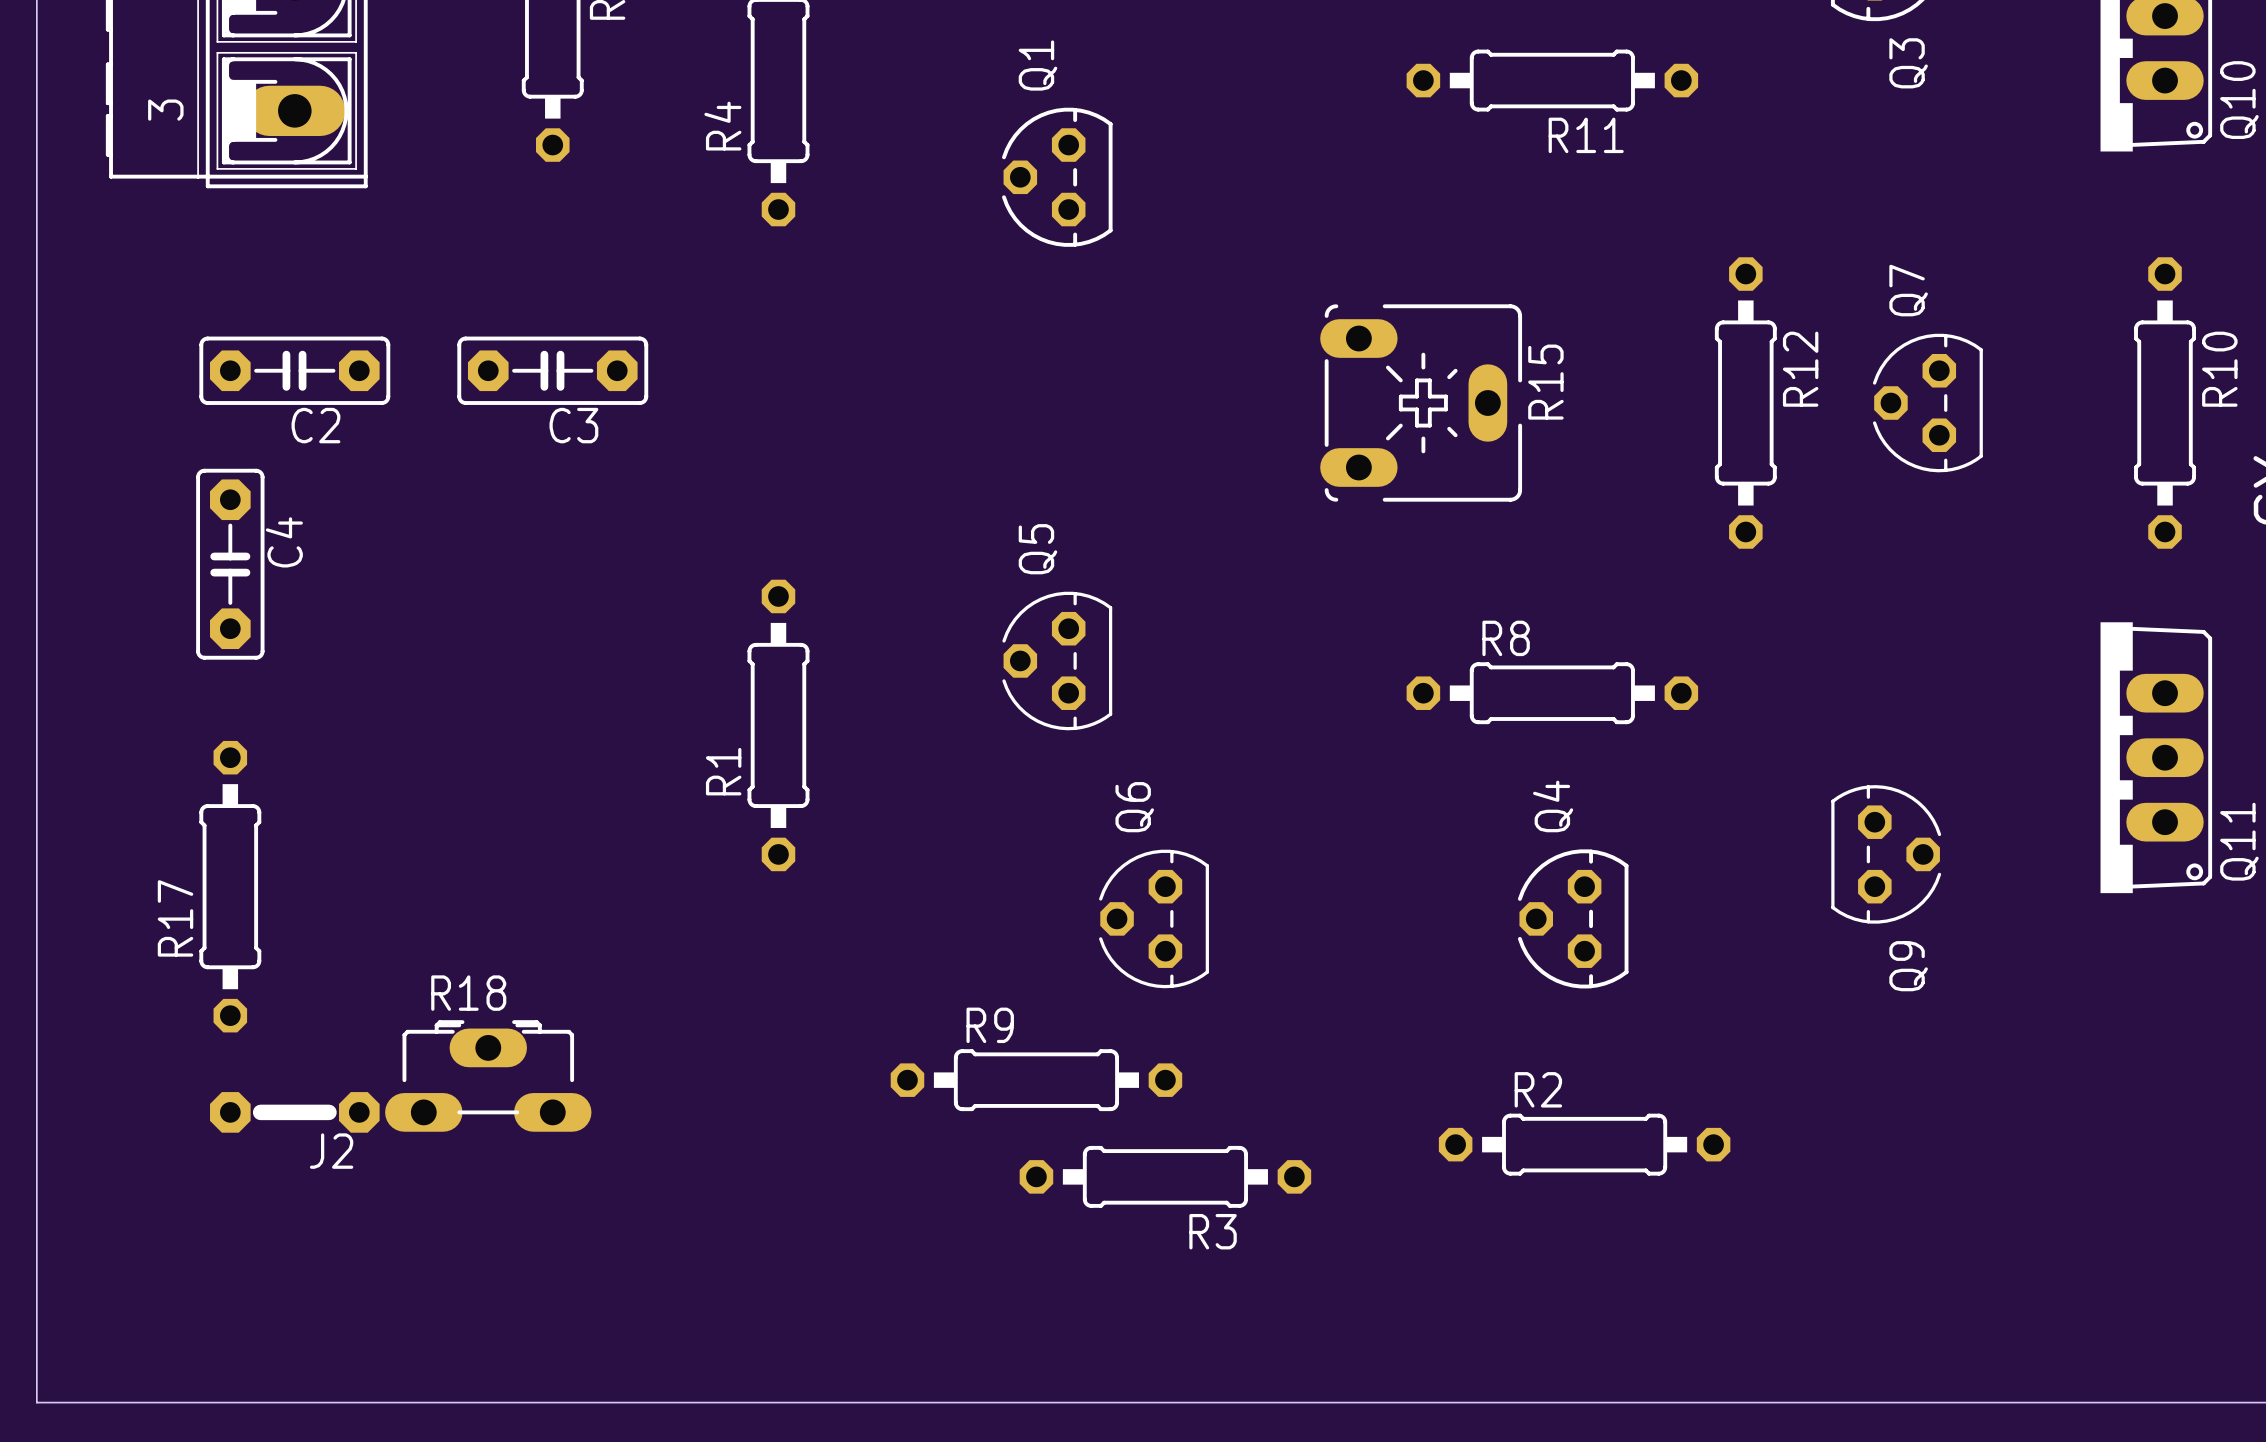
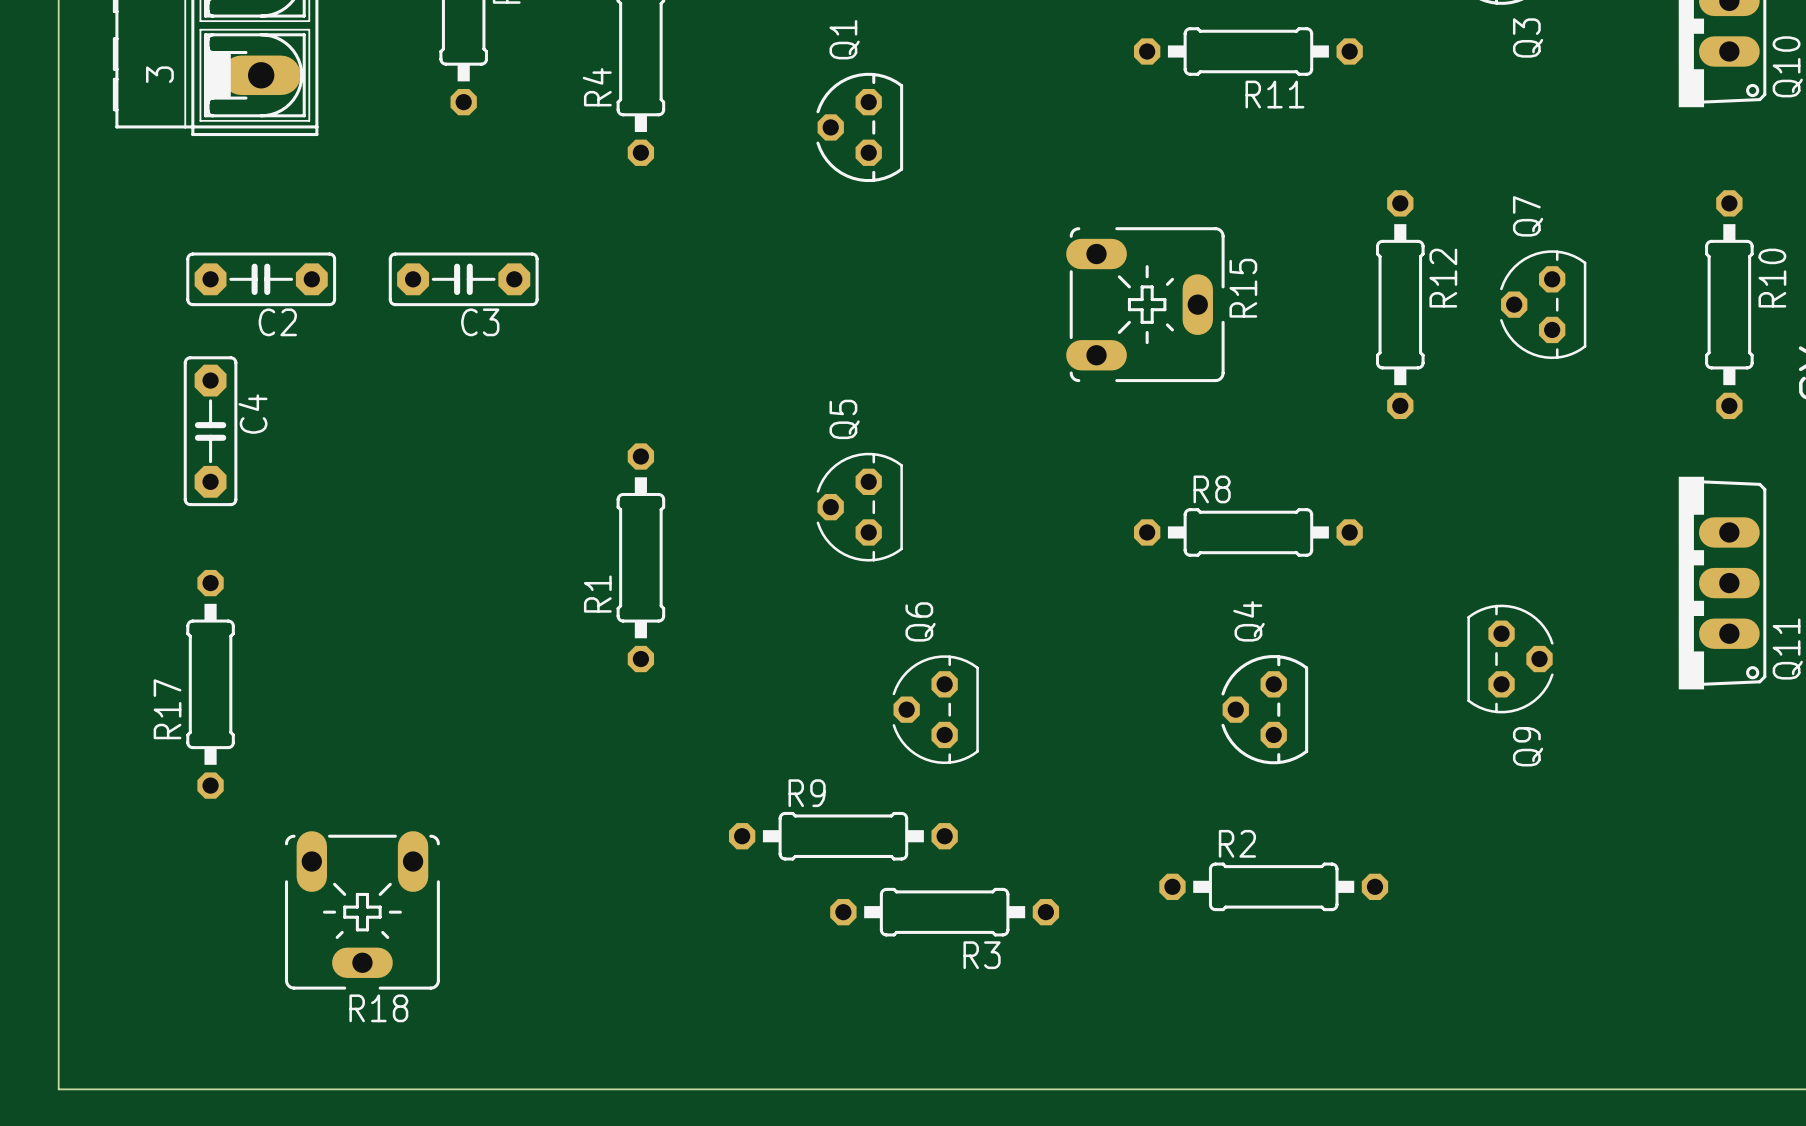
R18 name position: R18 (468, 993) -> R18 (378, 1008)
R18 footprint: [385, 1020, 592, 1132] -> [284, 831, 440, 990]
J2: (294, 1112) -> none

